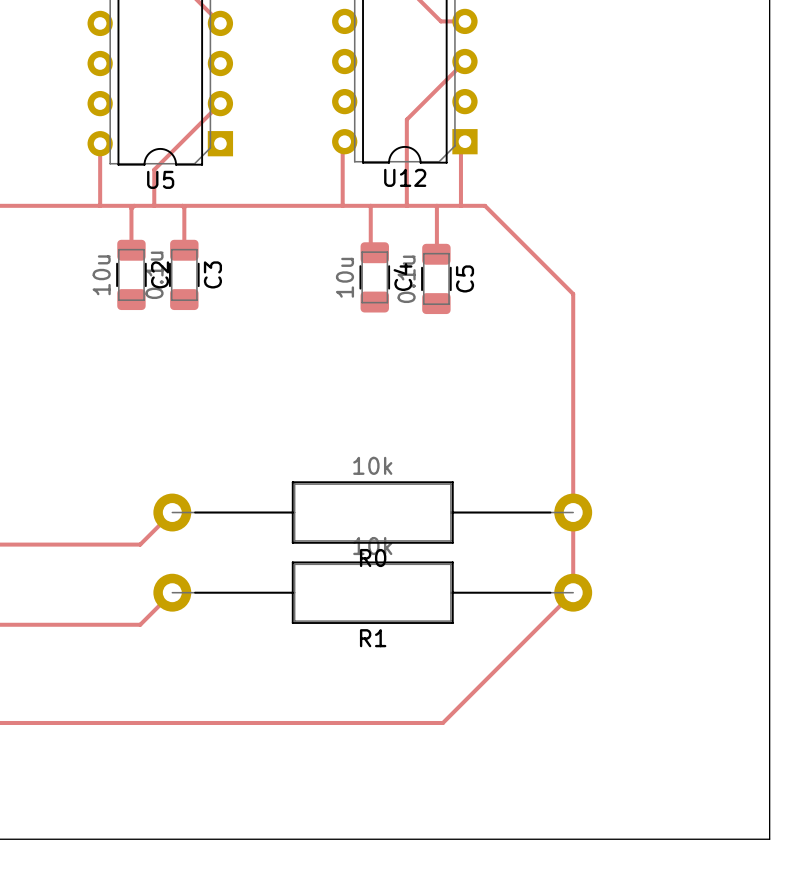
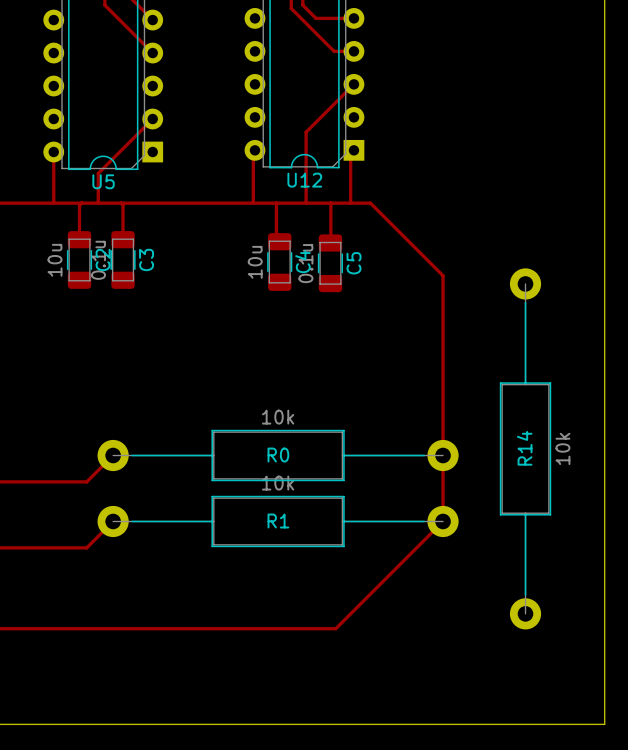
R14: none -> 10k (525, 448)
R0 name position: R0 (373, 558) -> R0 (278, 455)
R1 name position: R1 (373, 638) -> R1 (278, 521)

